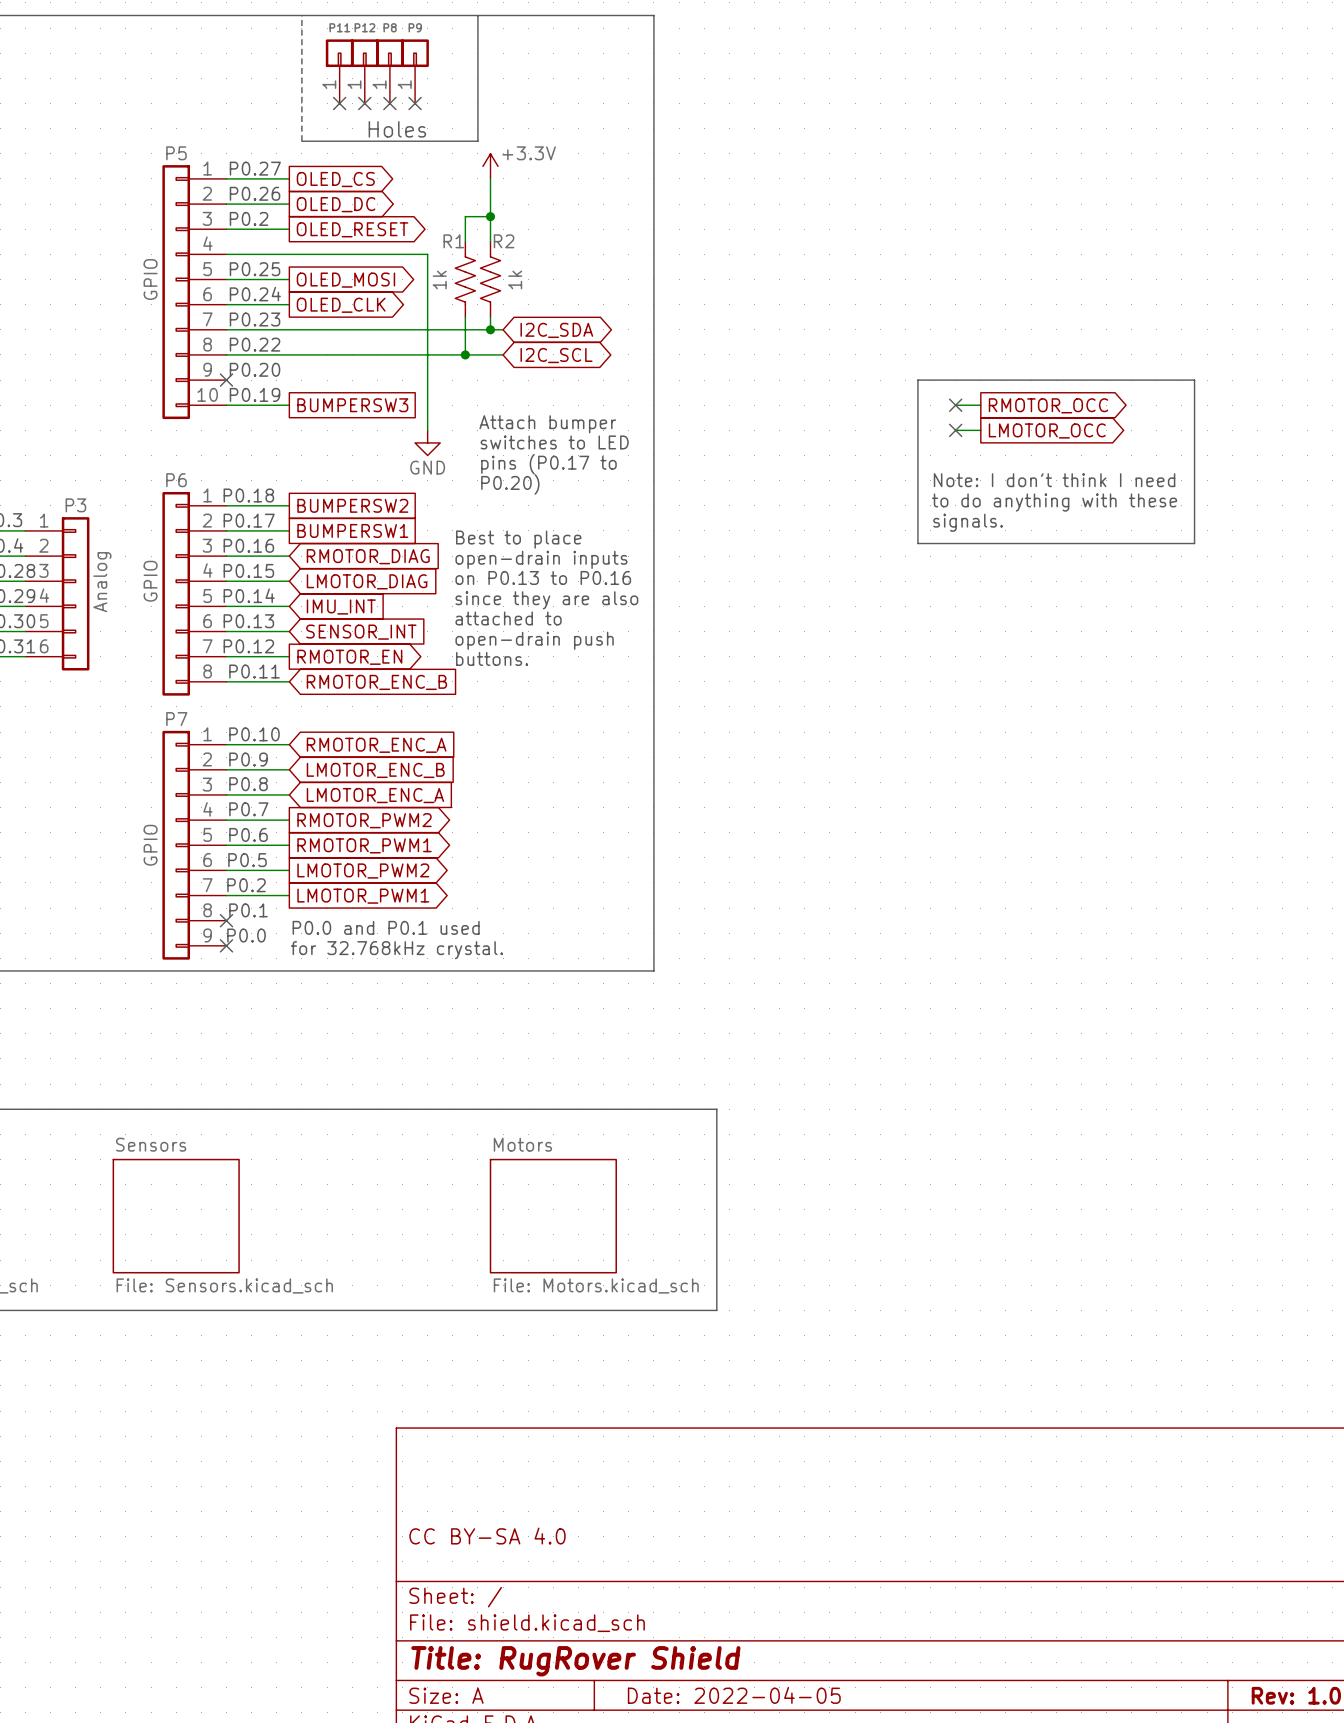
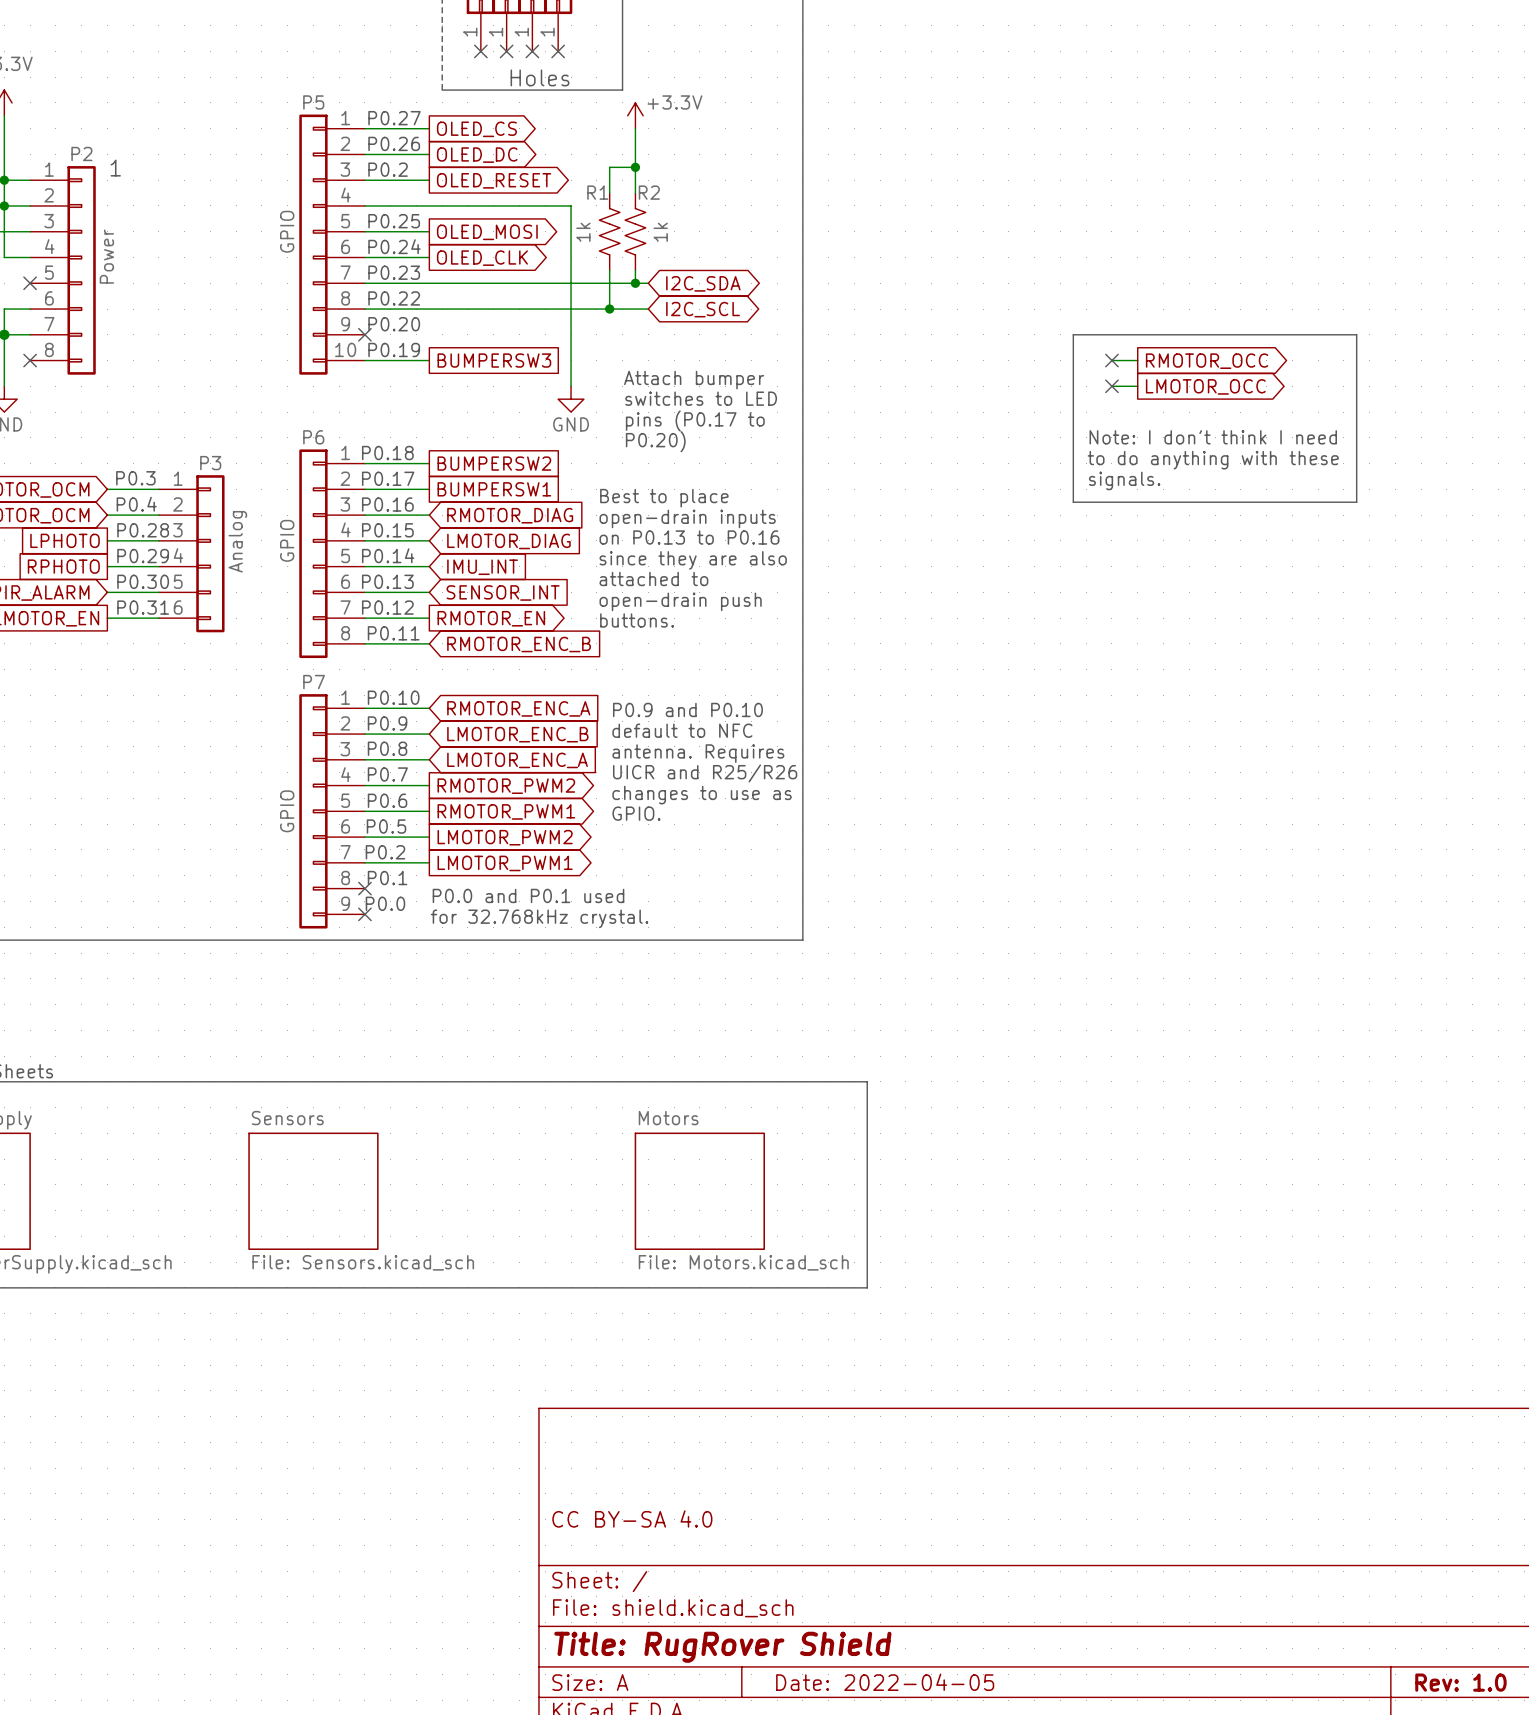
text: none -> P0.9 and P0.10 (687, 709)
text: none -> default to NFC (682, 730)
text: none -> antenna. Requires (698, 753)
text: none -> UICR and R25/R26 (705, 773)
text: none -> changes to use as (702, 795)
text: none -> GPIO. (636, 813)

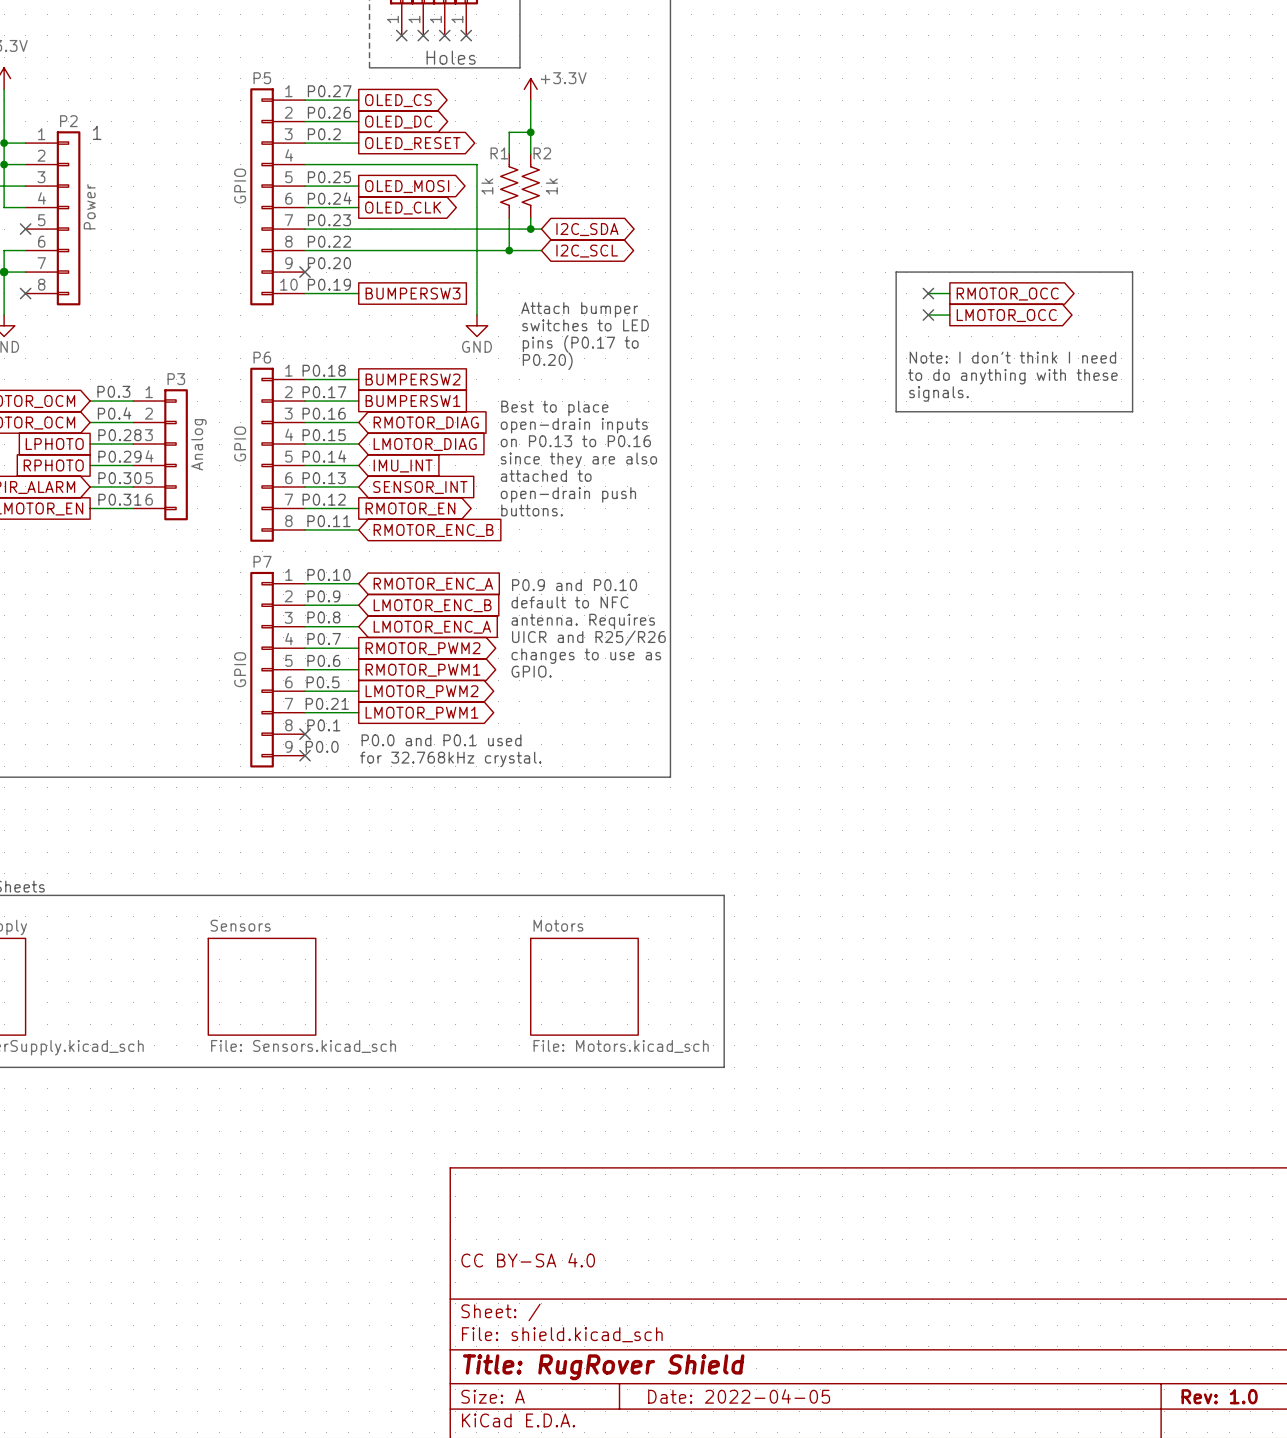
text: P0.2 (385, 852) -> P0.21 (327, 703)

